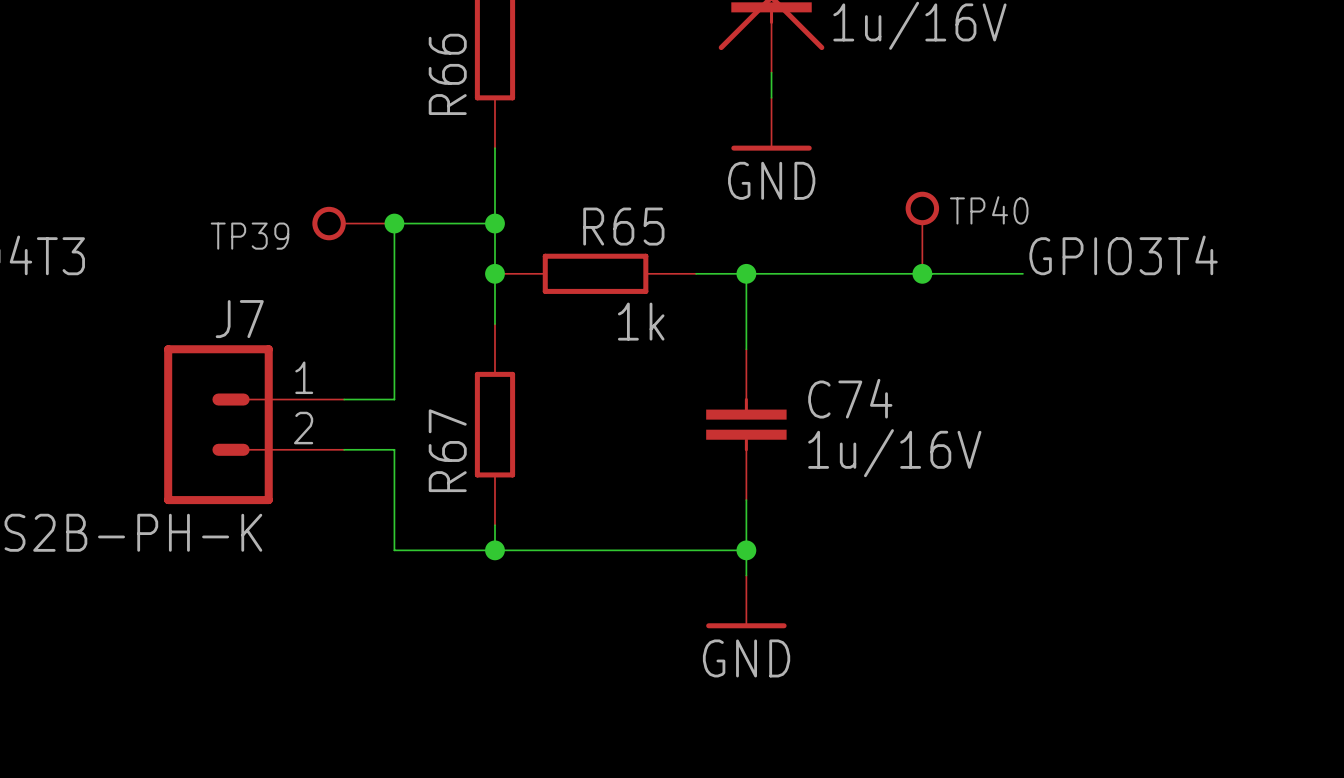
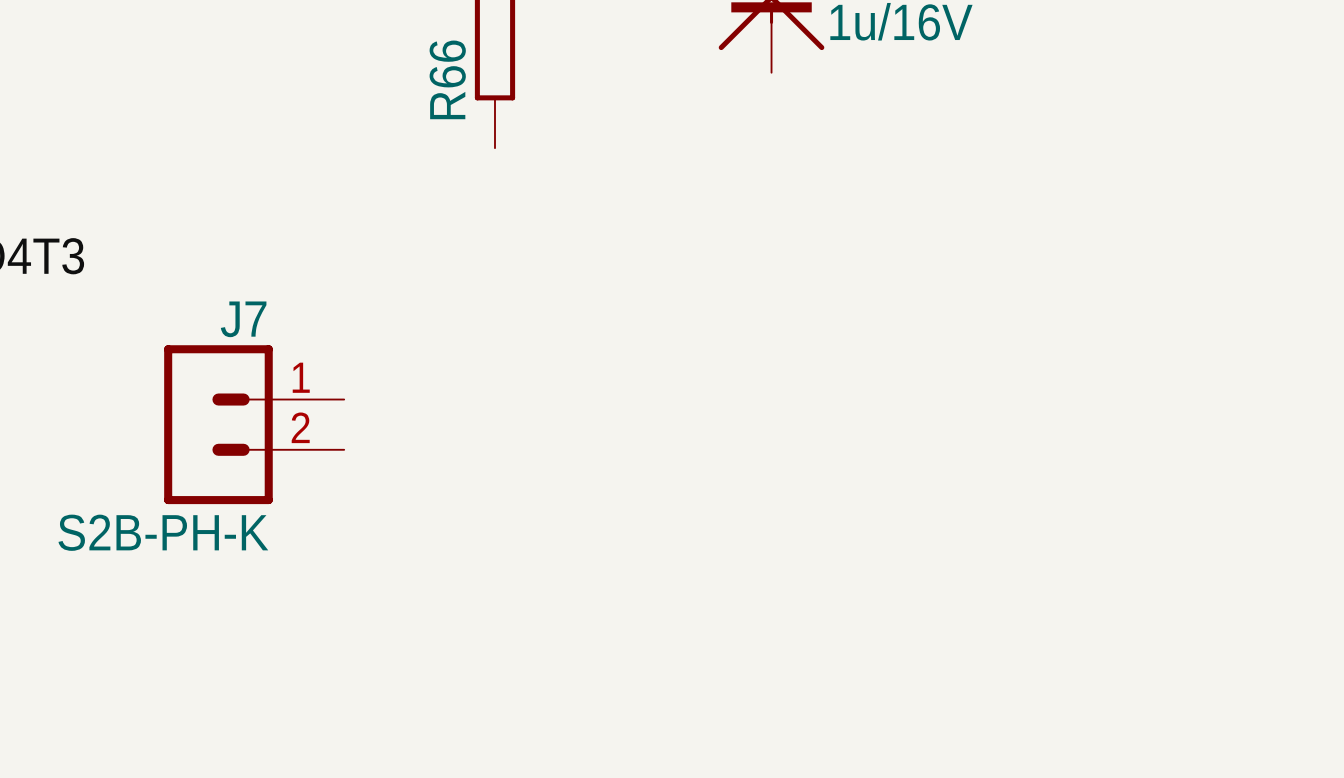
wire: (771, 72) (771, 97) -> none
power symbol: GND (771, 124) -> none
wire: (494, 148) (494, 324) -> none
TP39: (353, 223) -> none
junction: (394, 223) -> none
wire: (494, 223) (394, 223) (394, 399) (344, 399) -> none
junction: (494, 223) -> none
TP40: (922, 232) -> none
label: GPIO3T4 (1123, 255) -> none
junction: (494, 273) -> none
R65: 1k (595, 273) -> none
wire: (696, 273) (1022, 273) -> none
wire: (746, 273) (746, 349) -> none
junction: (746, 273) -> none
junction: (922, 273) -> none
R67: (494, 424) -> none
C74: 1u/16V (746, 424) -> none
wire: (344, 449) (394, 449) (394, 550) (746, 550) -> none
wire: (746, 500) (746, 575) -> none
wire: (494, 525) (494, 550) -> none
junction: (494, 550) -> none
junction: (746, 550) -> none
power symbol: GND (746, 601) -> none

